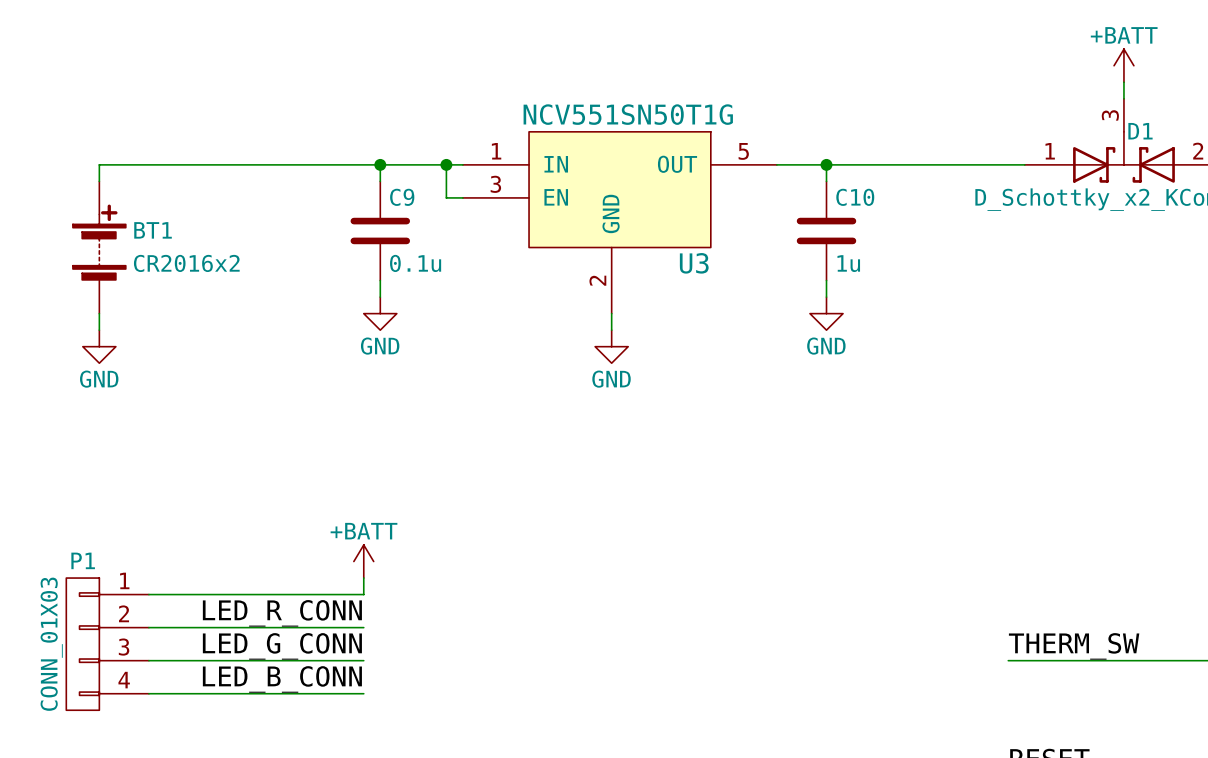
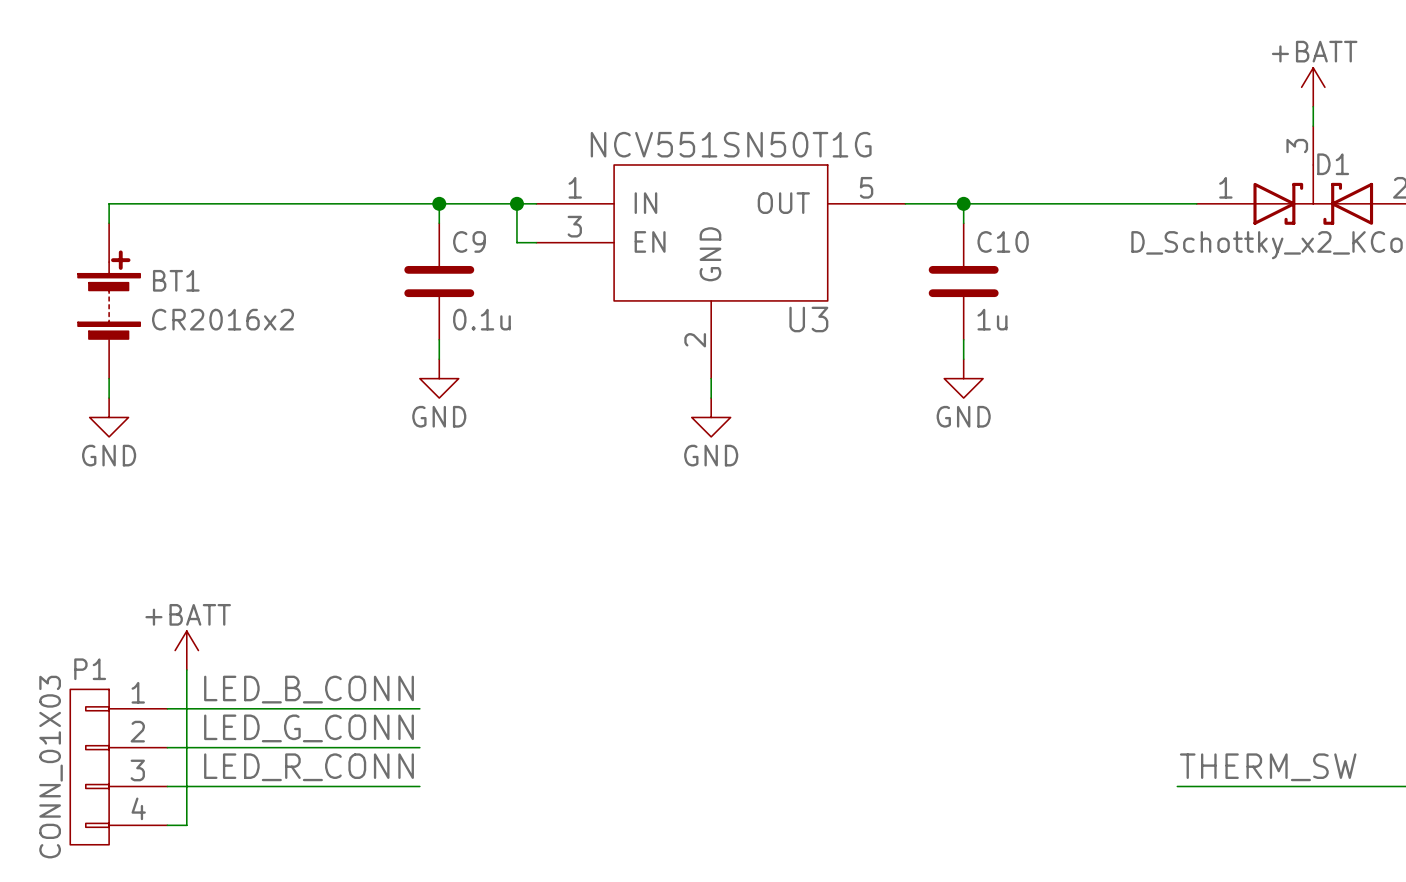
power symbol position: +BATT (363, 561) -> +BATT (186, 650)
wire: (363, 578) (363, 594) -> none
label: LED_R_CONN (282, 613) -> LED_G_CONN (309, 728)
label: LED_G_CONN (282, 646) -> LED_R_CONN (309, 767)
label position: LED_B_CONN (282, 679) -> LED_B_CONN (309, 689)
wire: (165, 693) (363, 693) -> (186, 825) (186, 669)

